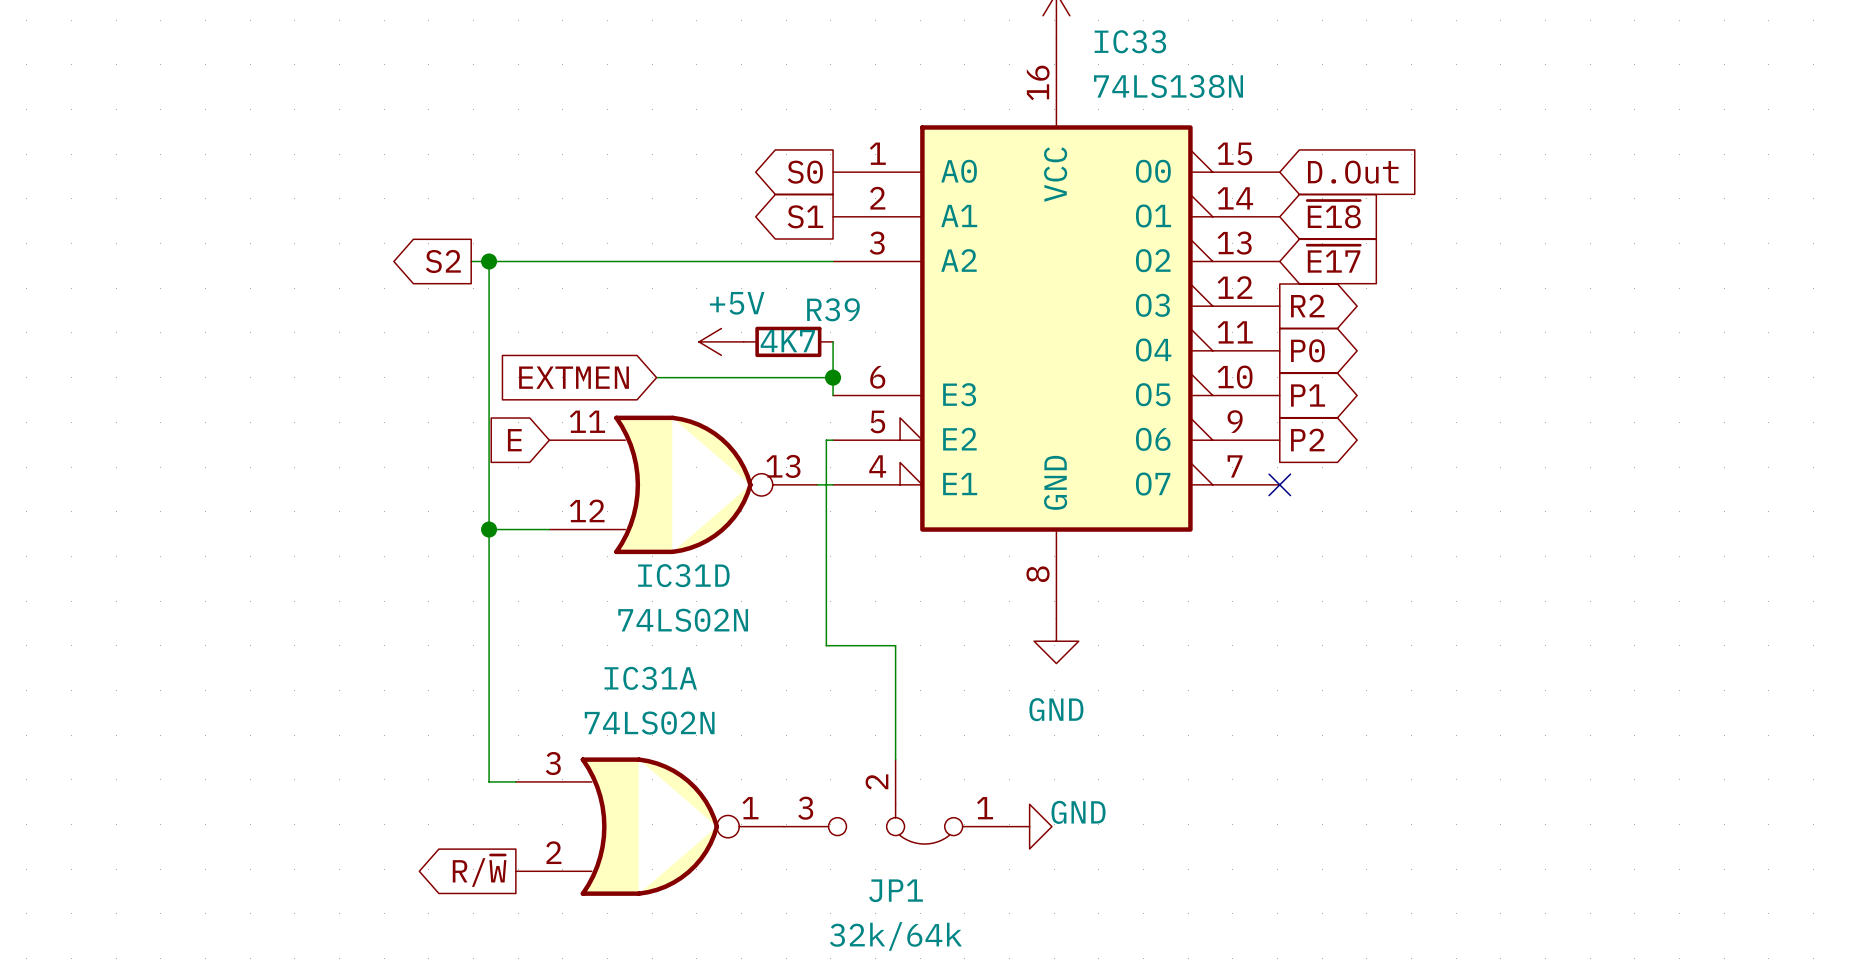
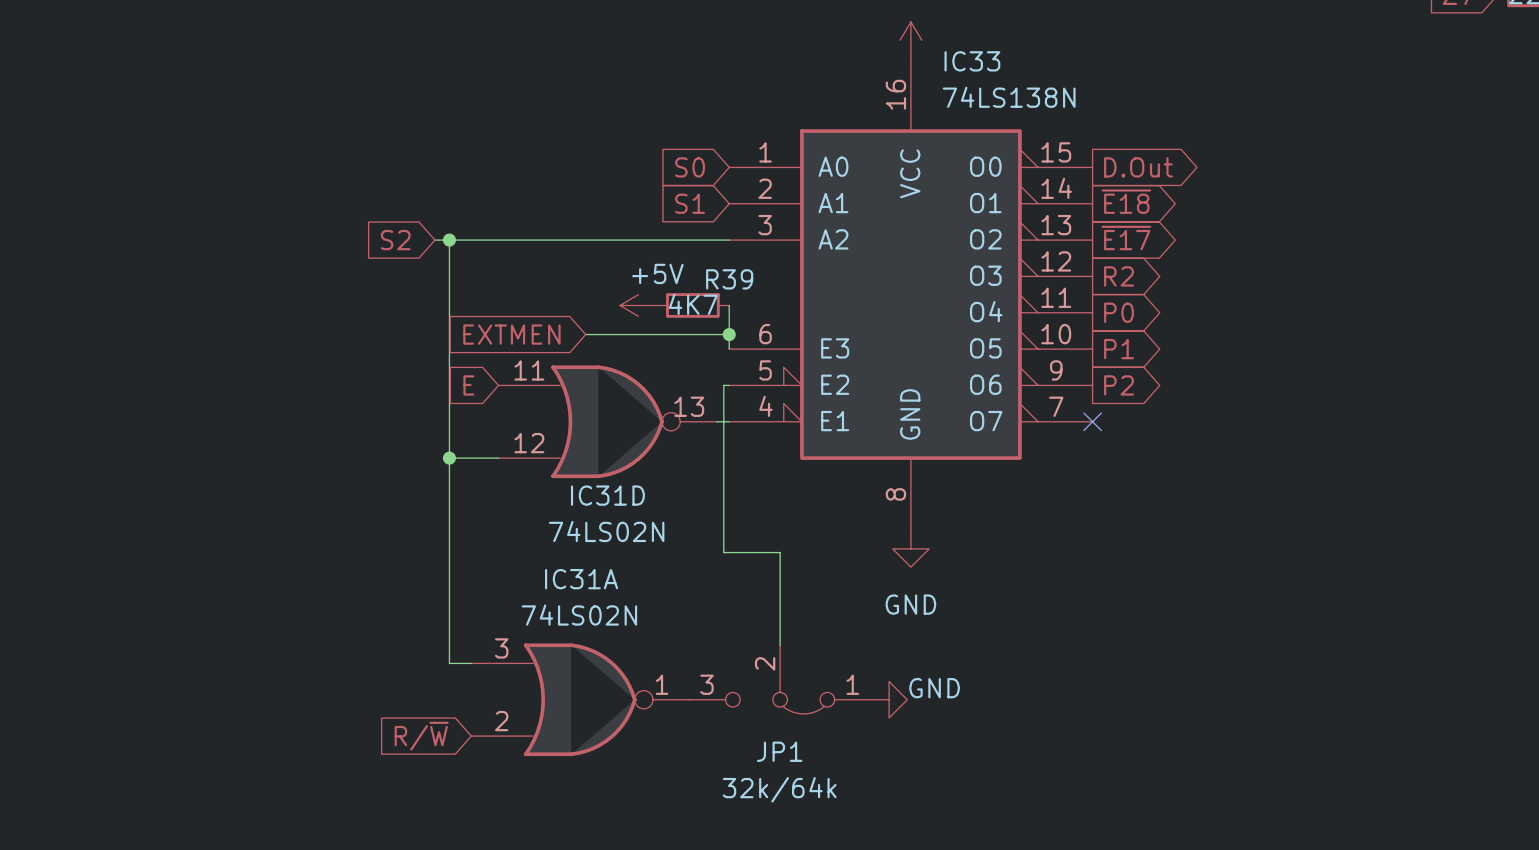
global label shape: output (805, 172) -> input (690, 167)
global label shape: input (1353, 172) -> output (1138, 167)
global label shape: input (1333, 214) -> output (1126, 201)
global label shape: output (805, 216) -> input (690, 203)
global label shape: input (1333, 258) -> output (1126, 237)
global label shape: output (443, 261) -> input (395, 240)
global label shape: output (479, 870) -> input (421, 736)

